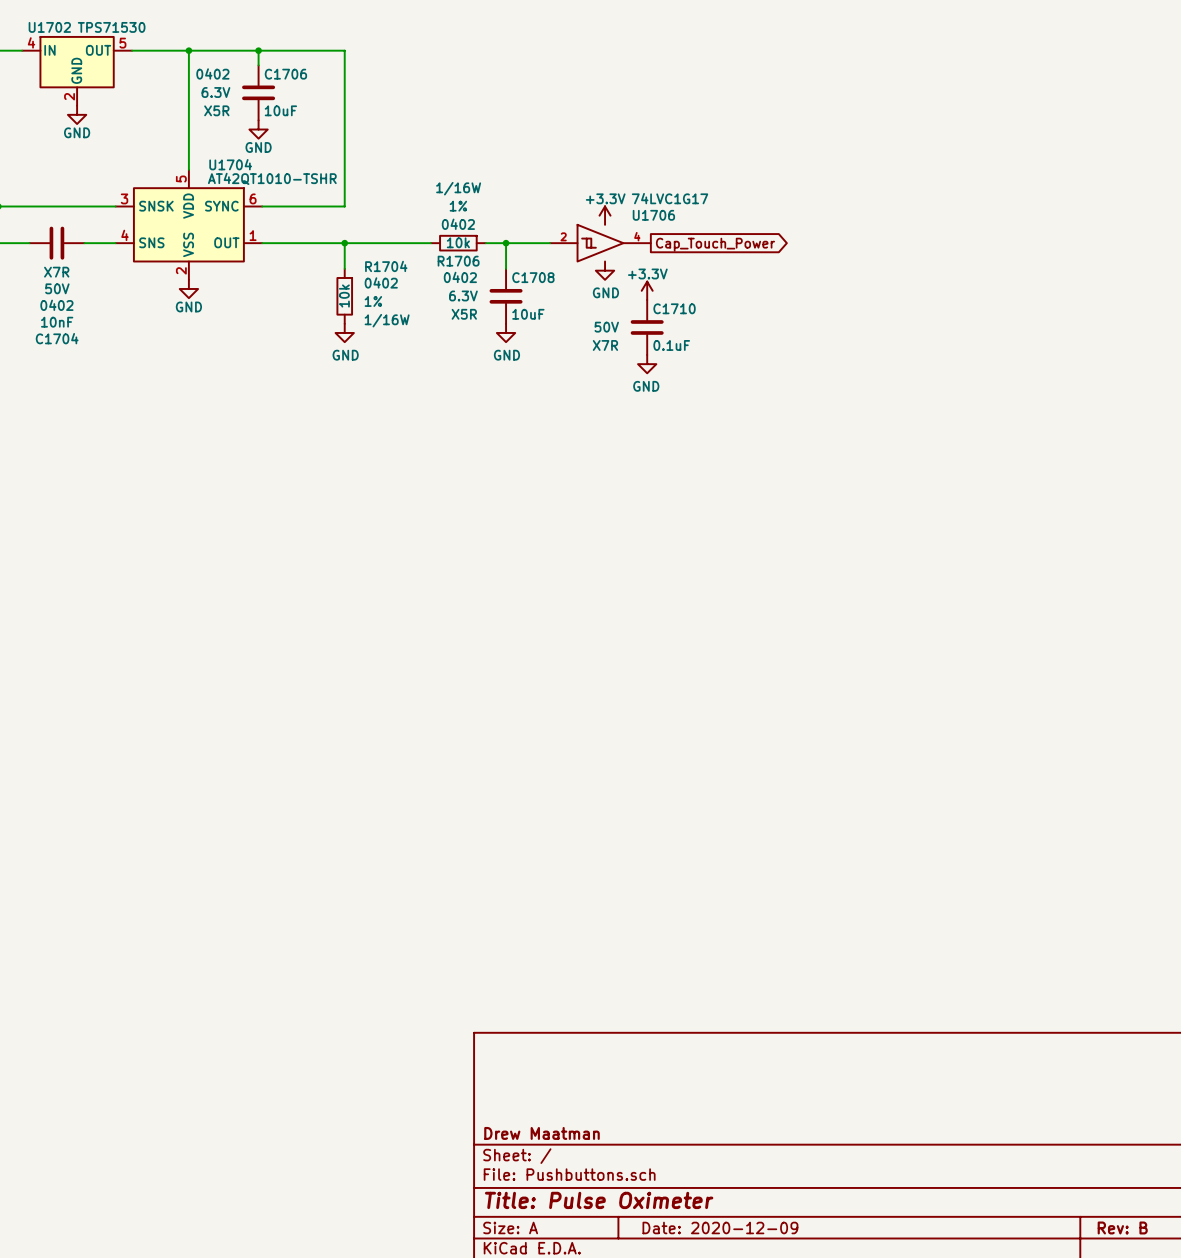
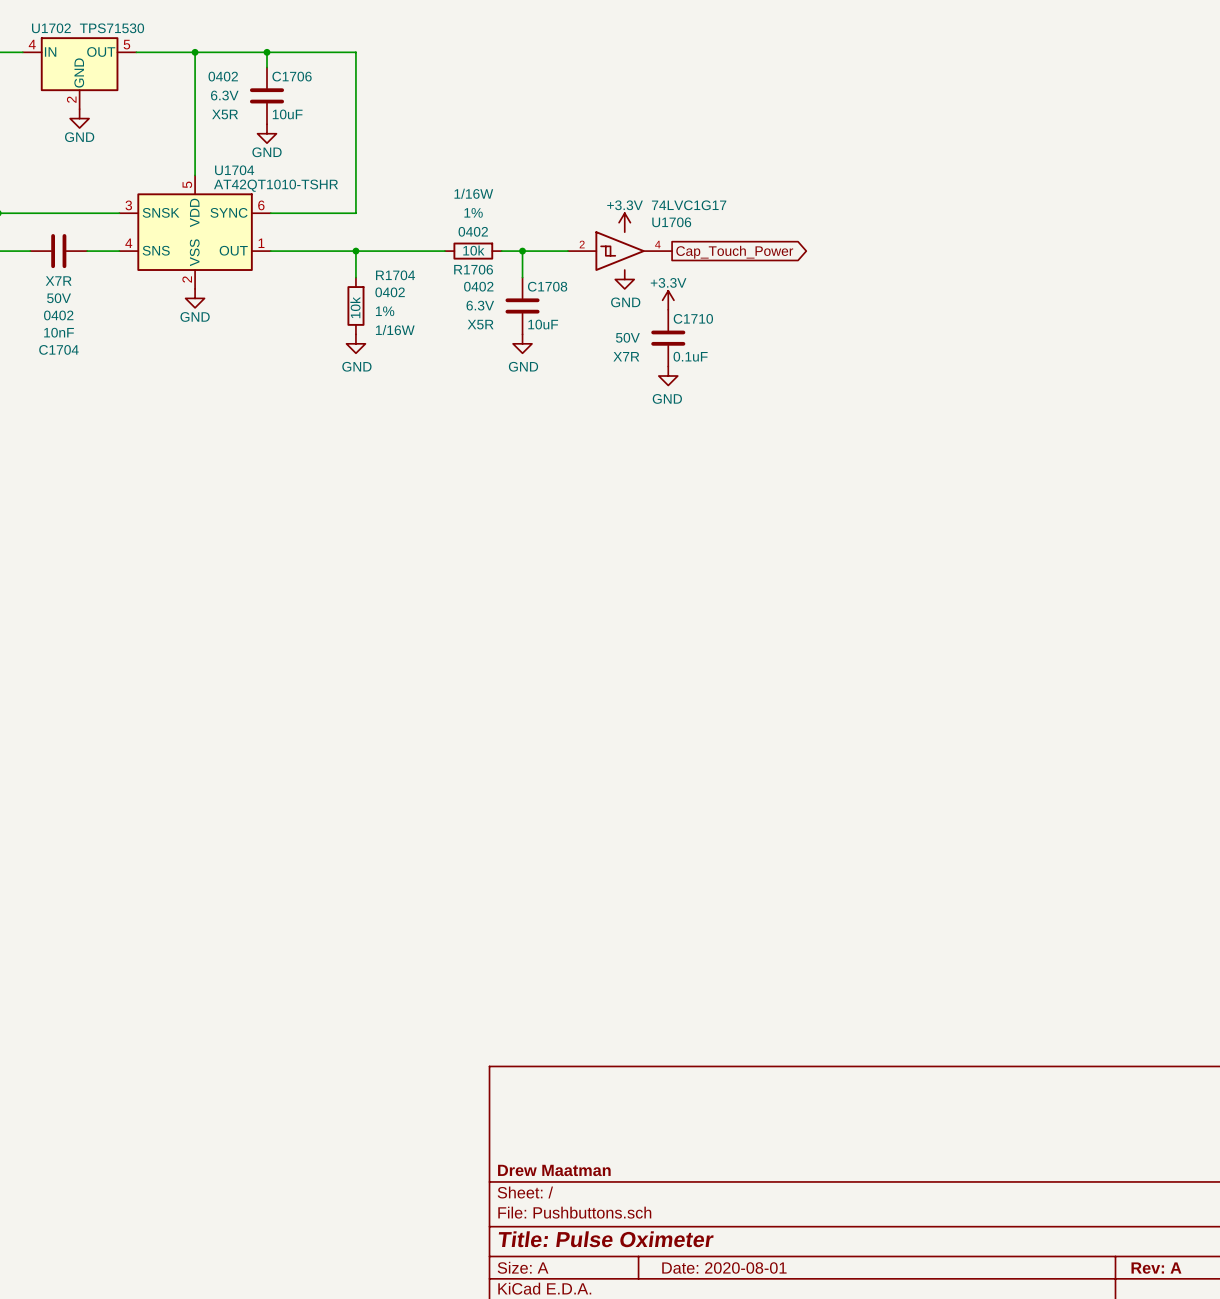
title block: Date: 2020-12-09 (720, 1227) -> Date: 2020-08-01 (724, 1267)
title block: Rev: B (1122, 1227) -> Rev: A (1156, 1268)

